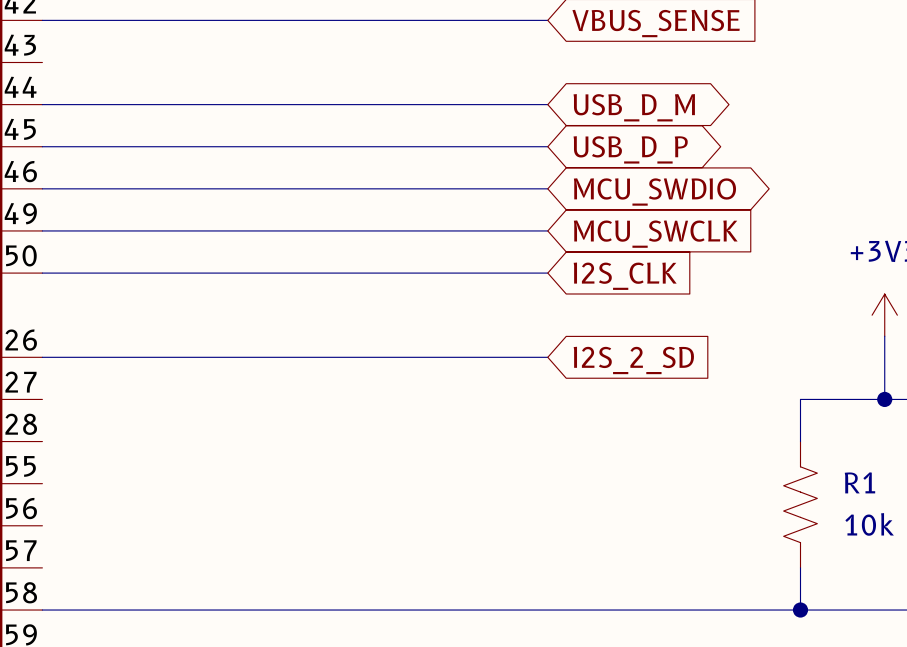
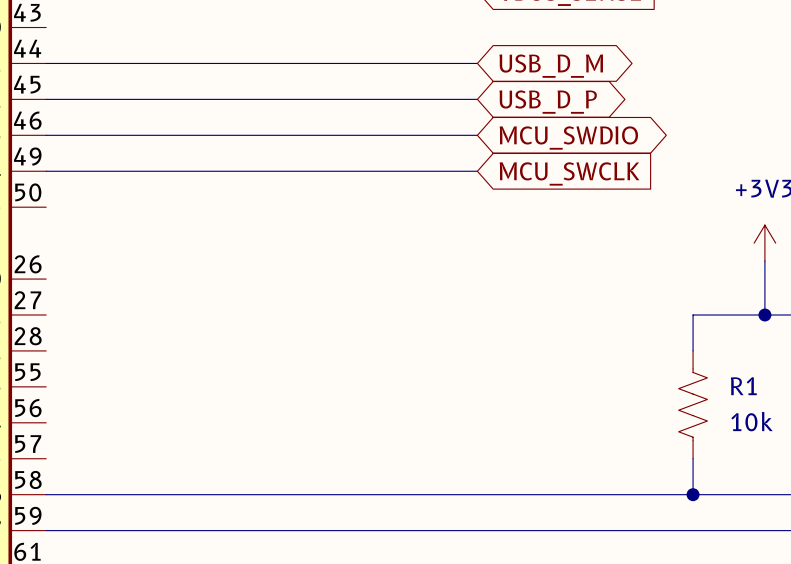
wire: (42, 273) (547, 273) -> none
global label: I2S_CLK (625, 276) -> none
wire: (42, 357) (547, 357) -> none
global label: I2S_2_SD (633, 360) -> none

